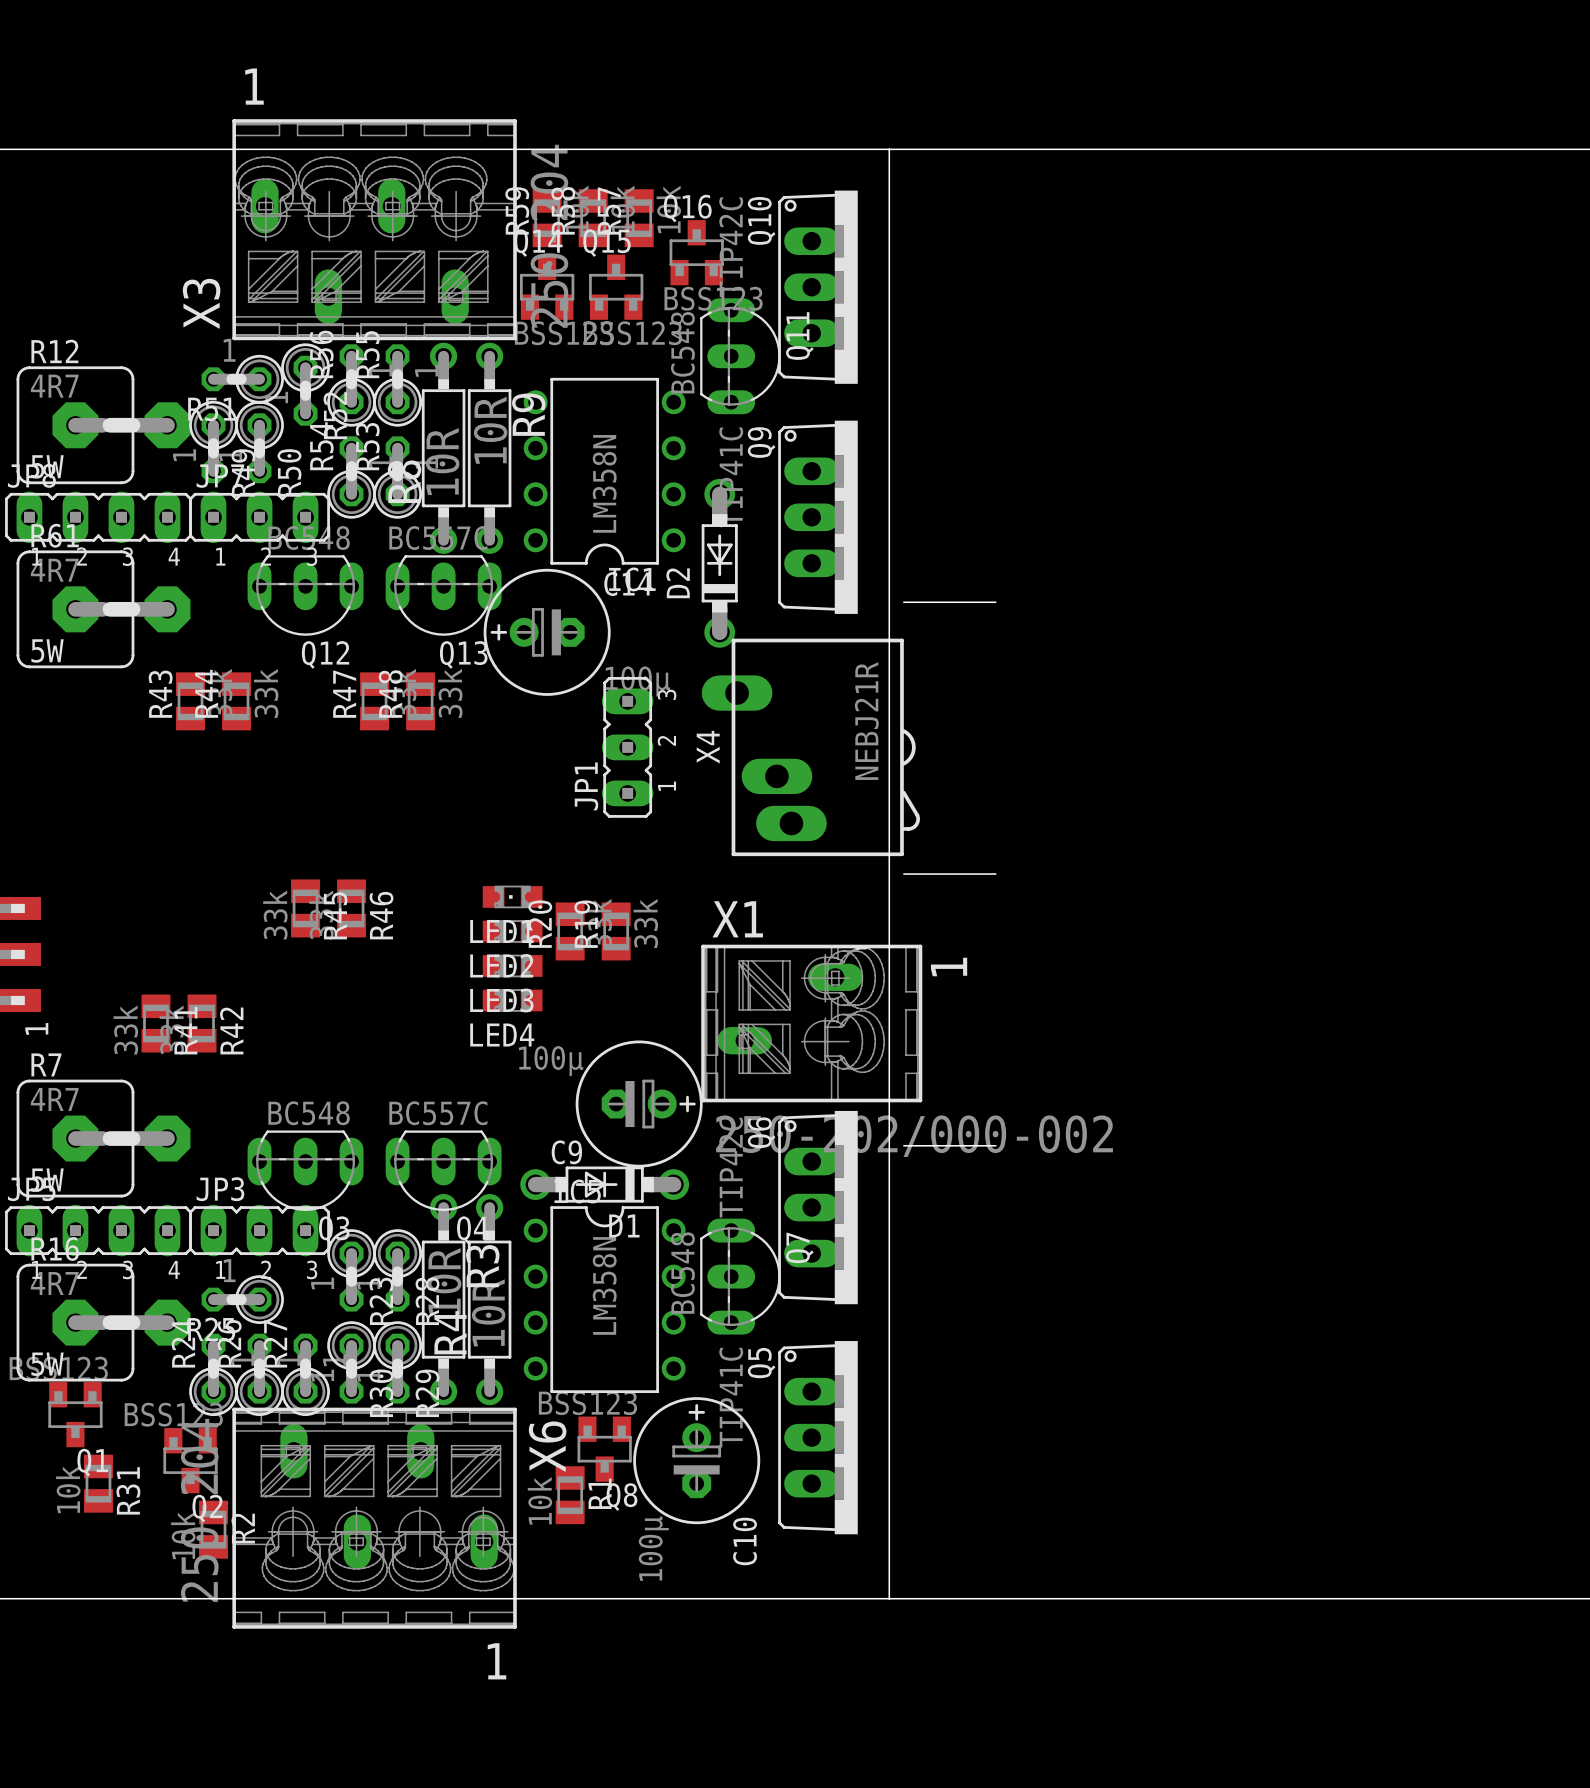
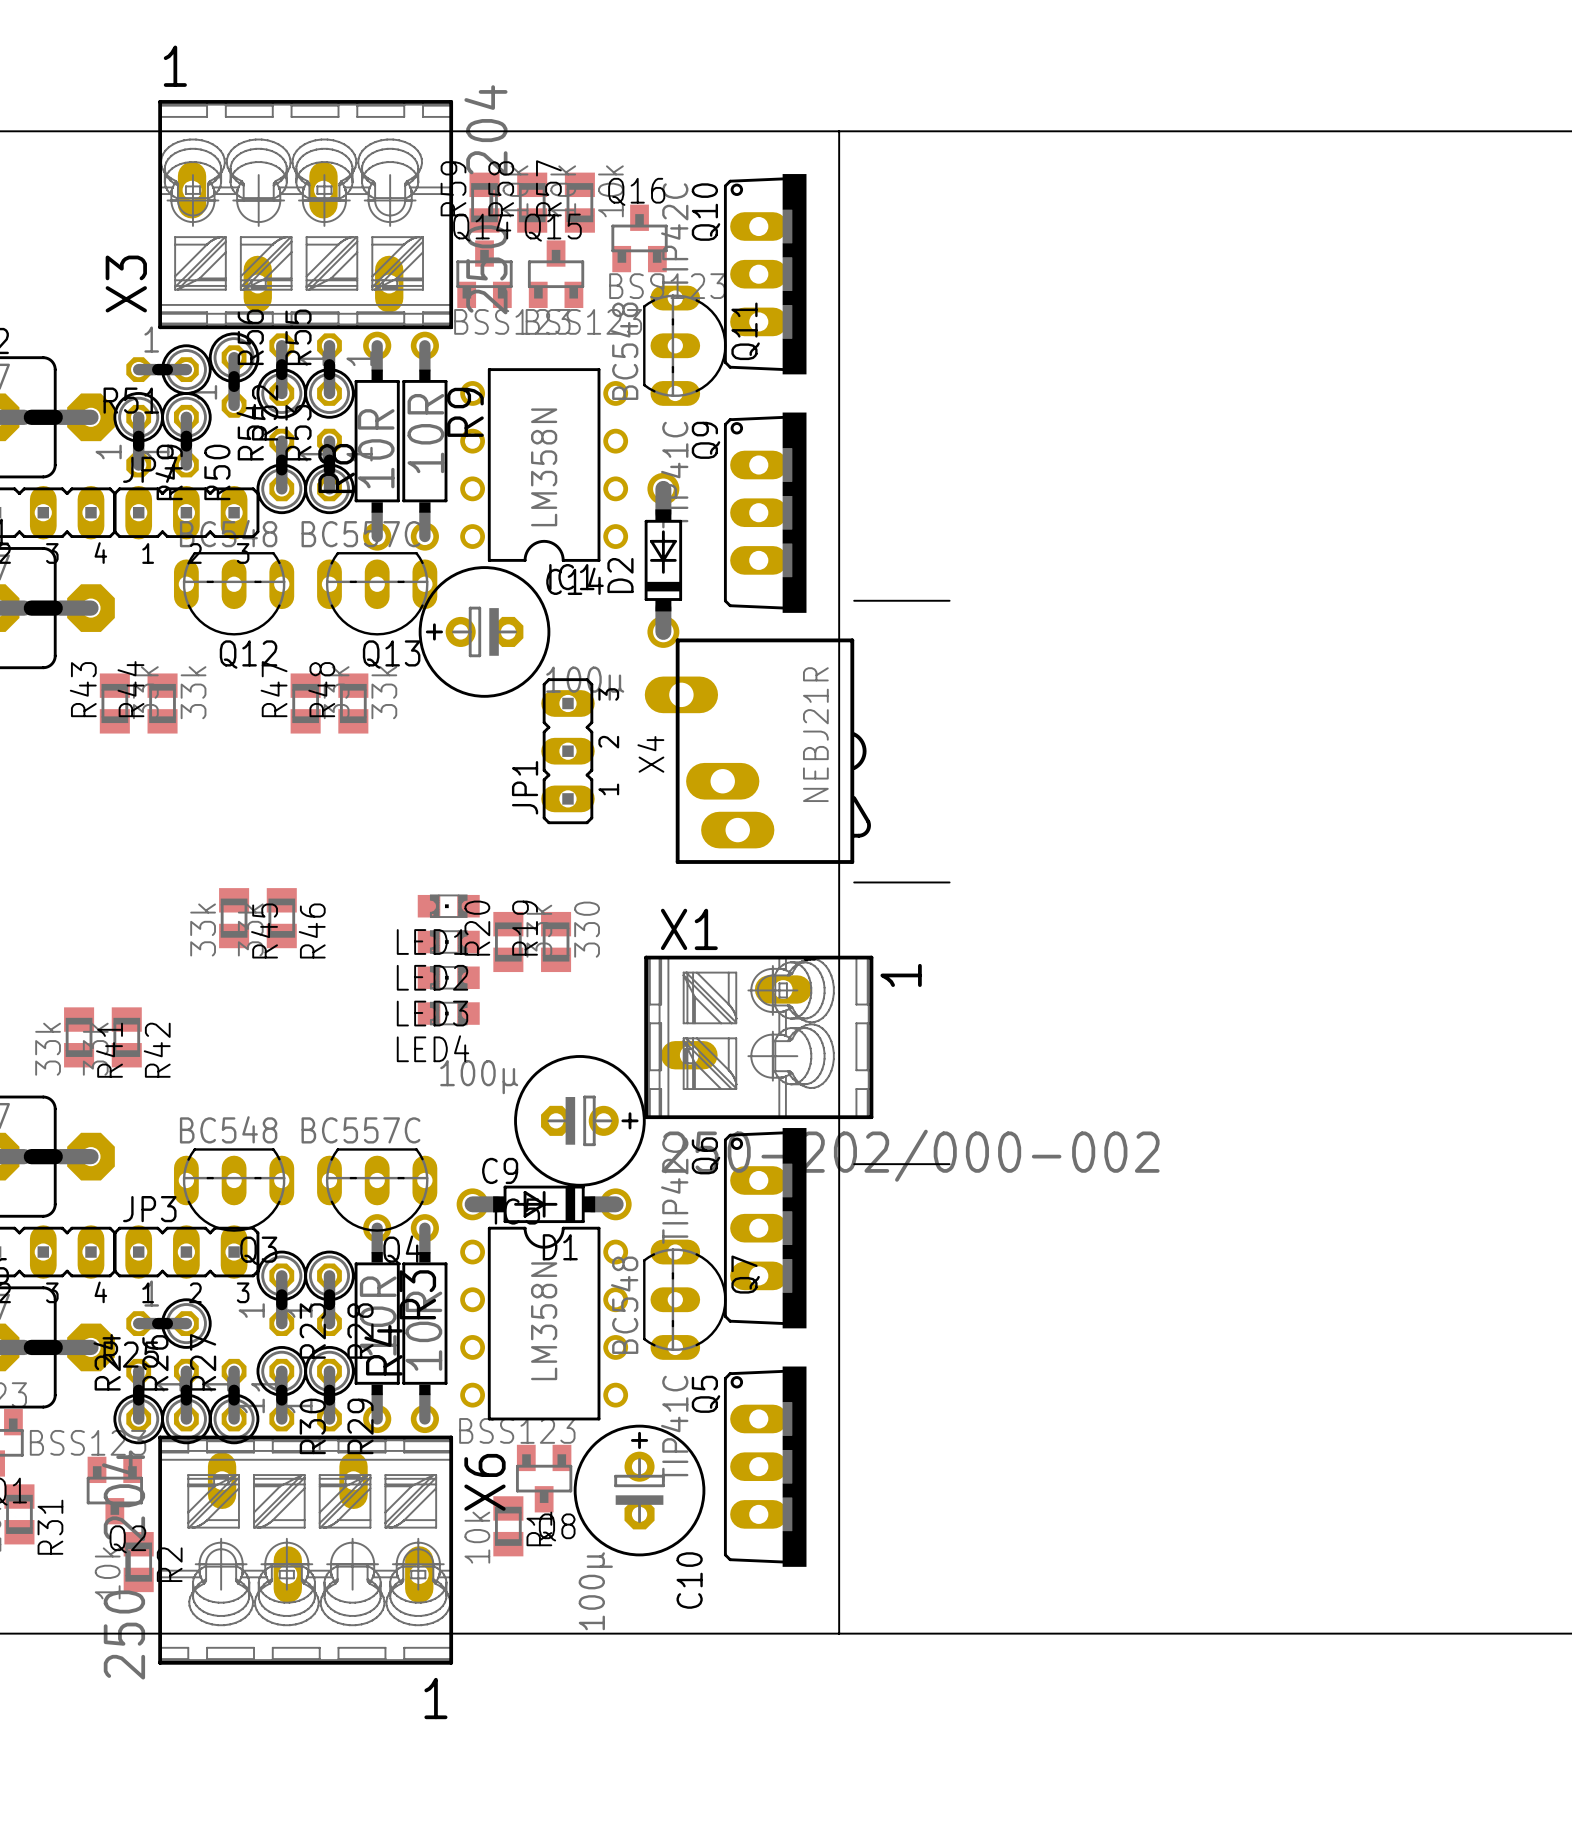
R19 value: 33k (645, 923) -> 330 (587, 929)

